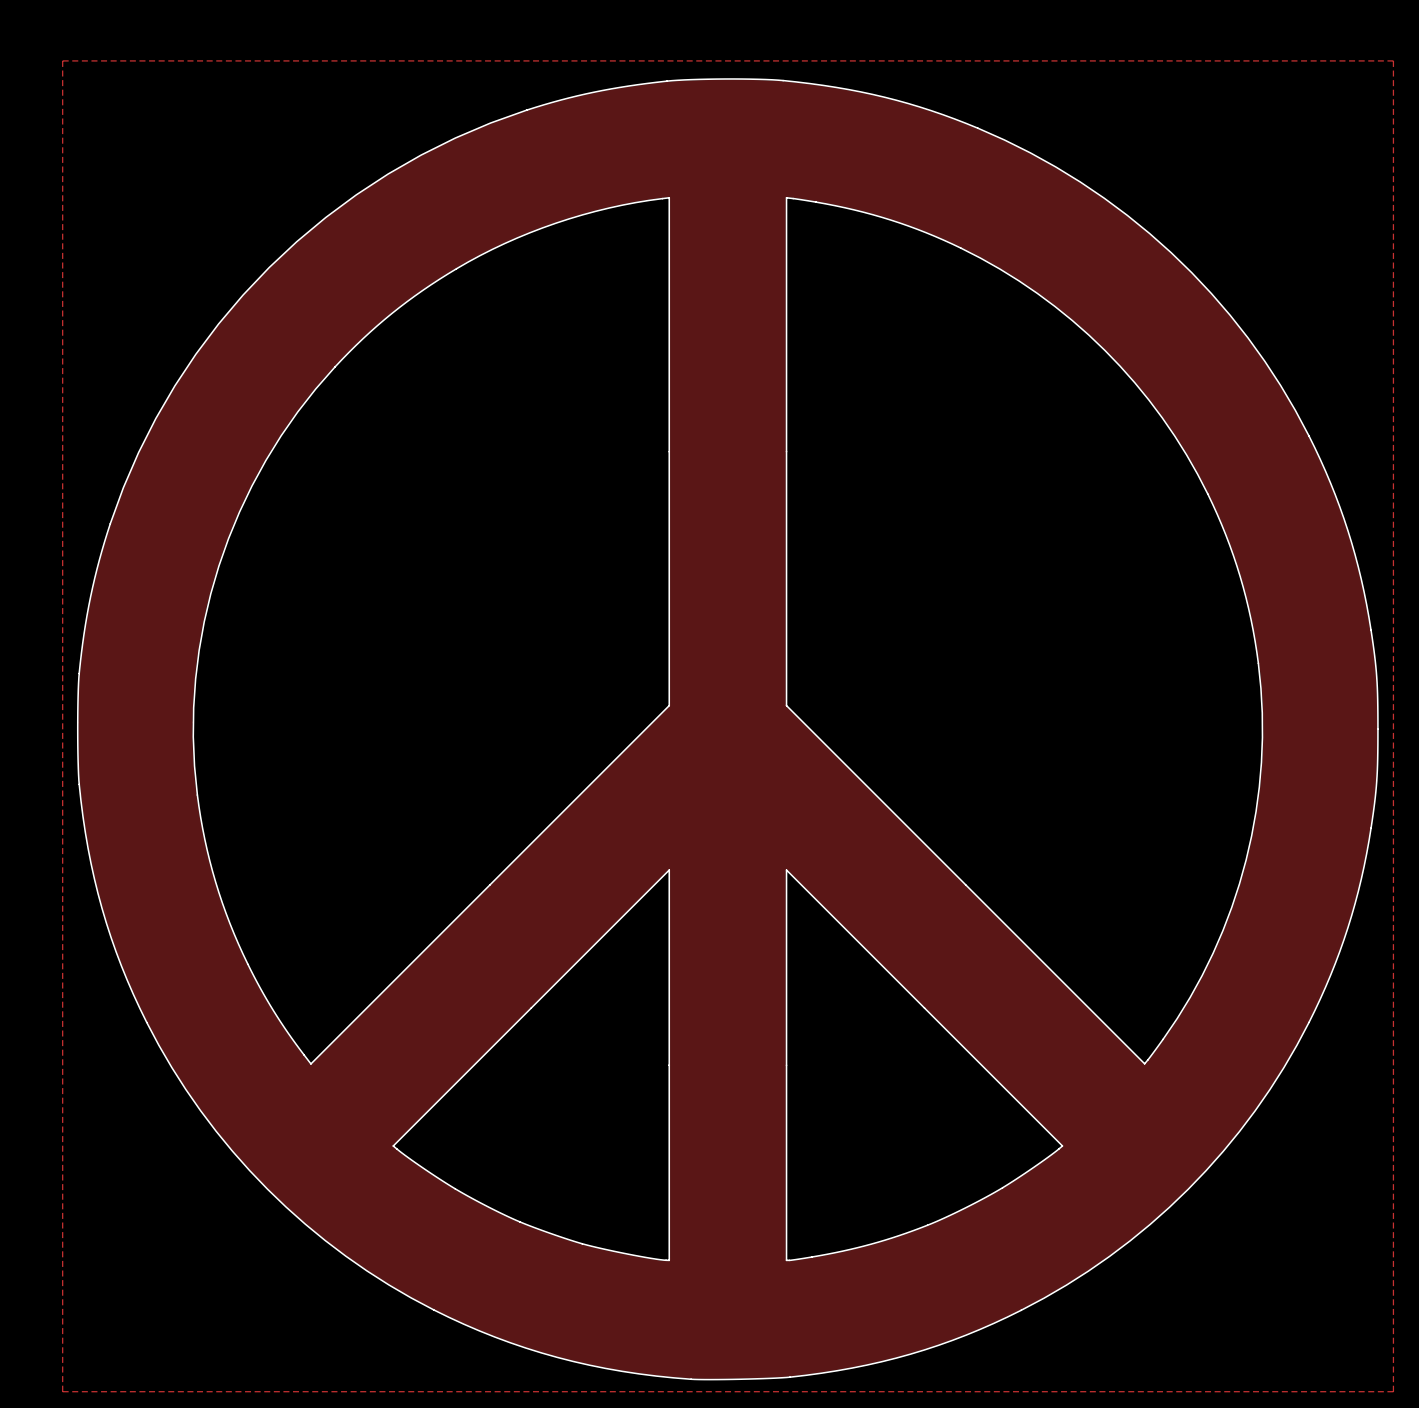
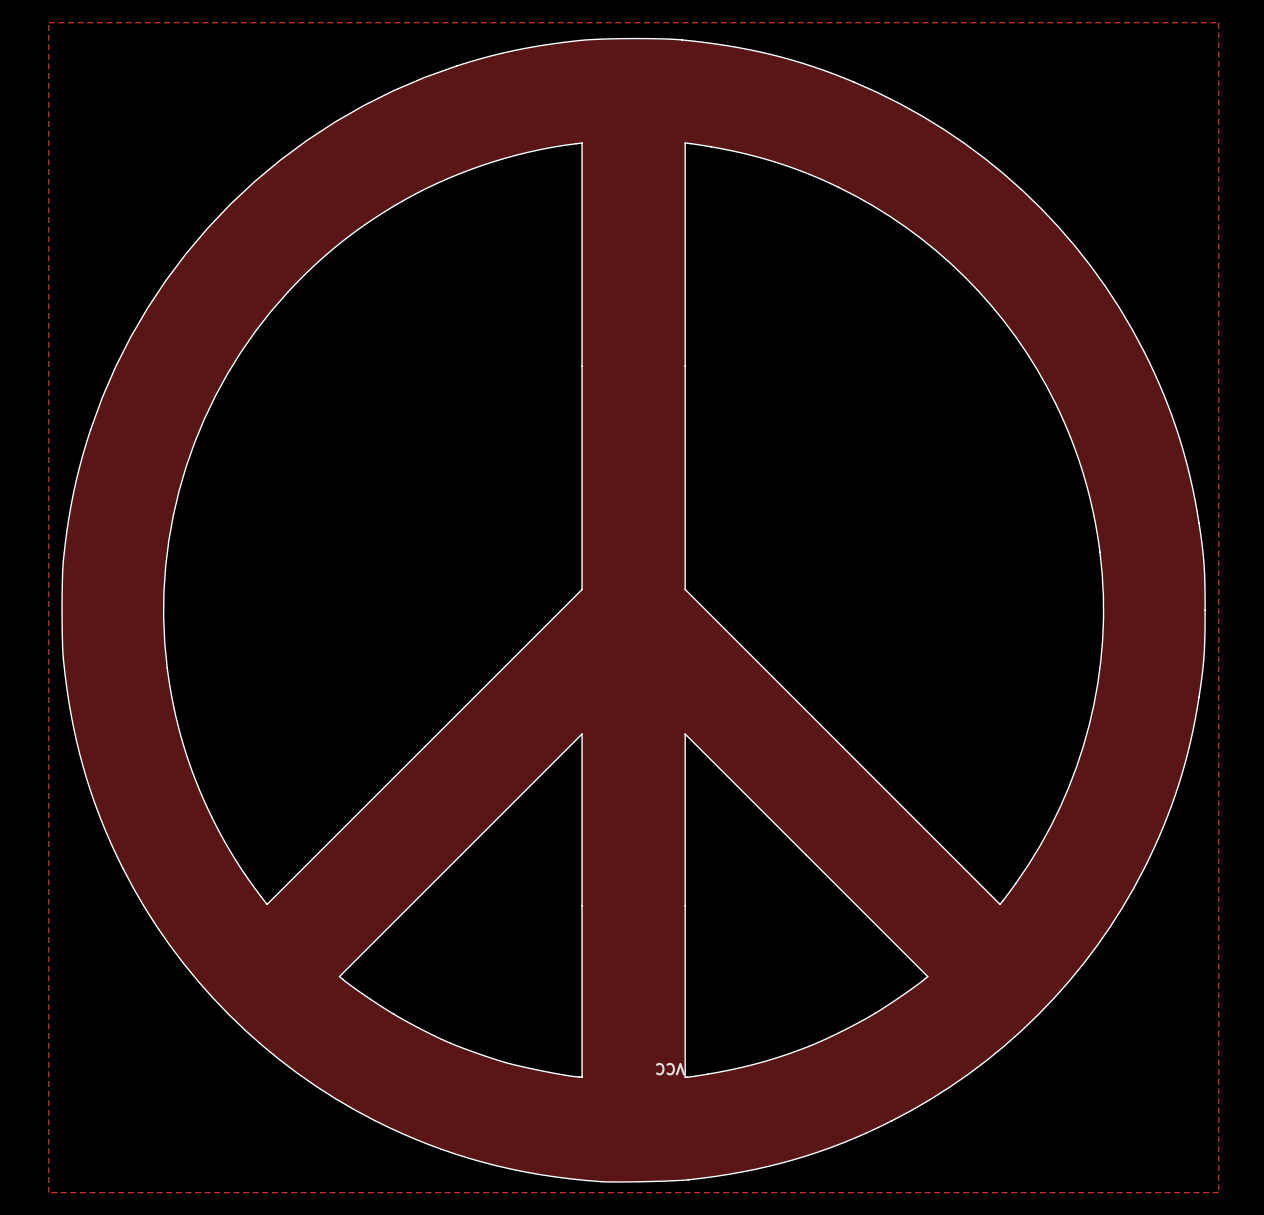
part: none -> (670, 1069)

